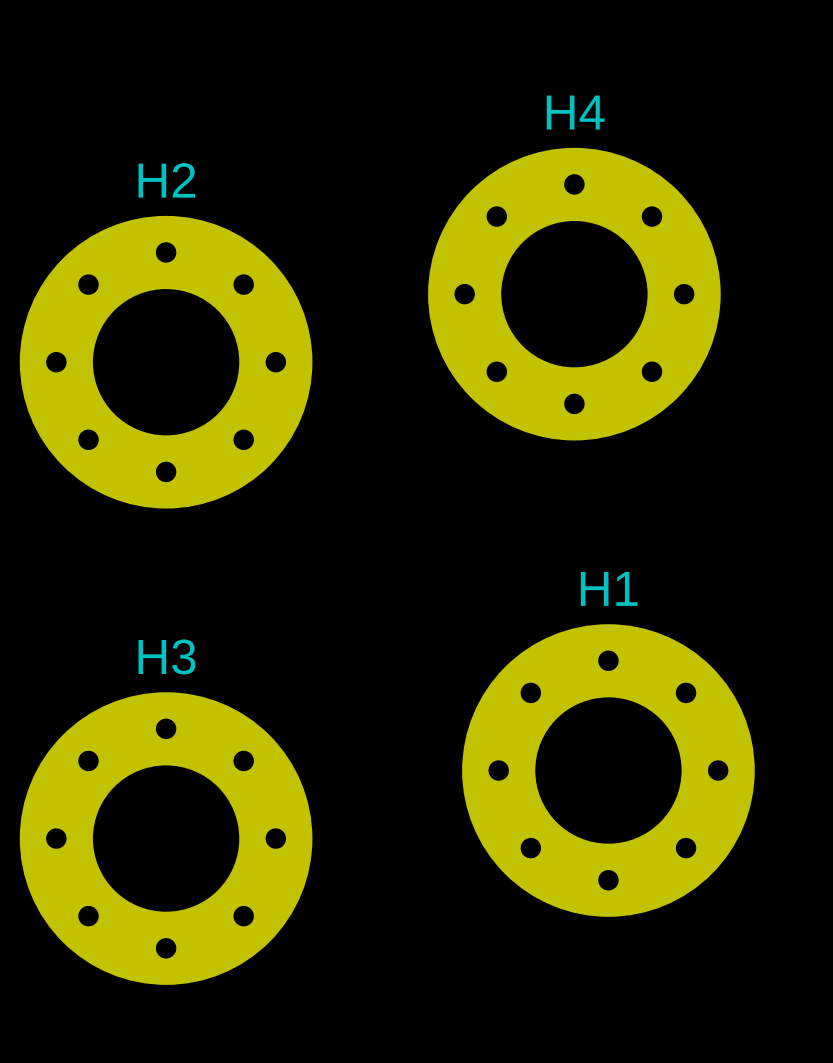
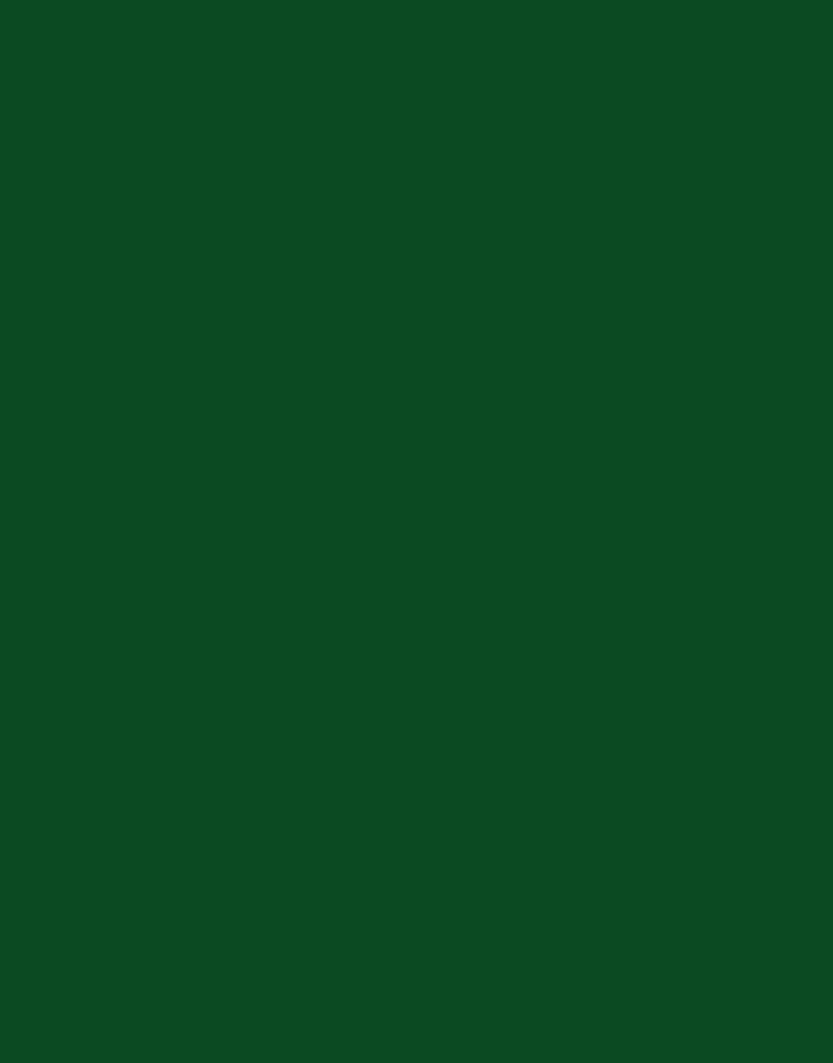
H4: (574, 294) -> none
H2: (166, 362) -> none
H1: (608, 770) -> none
H3: (166, 838) -> none

